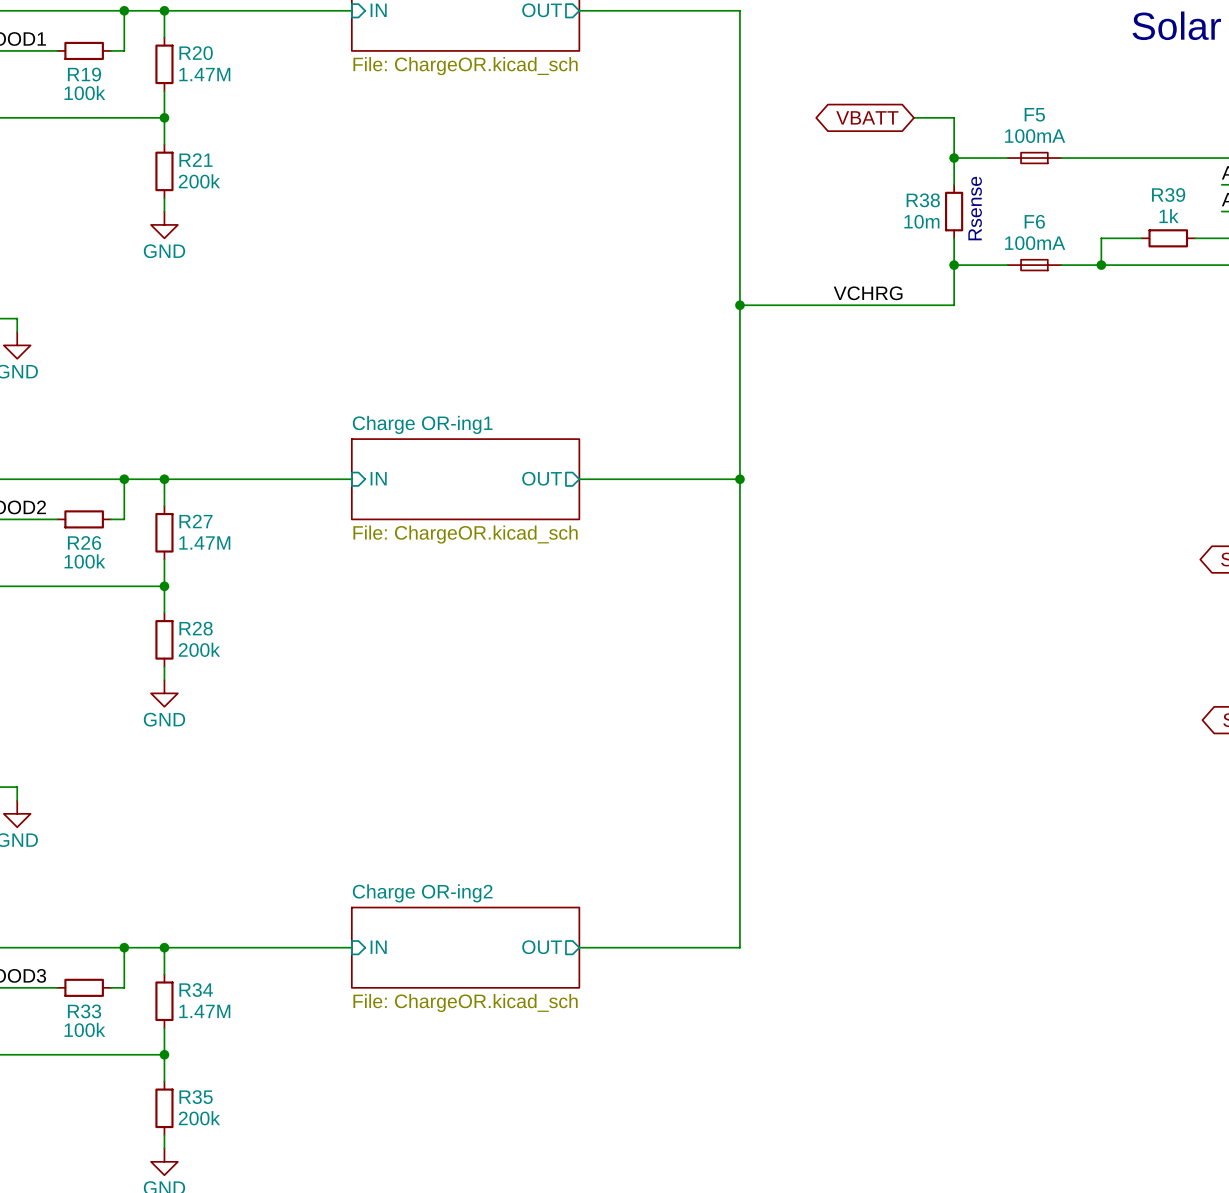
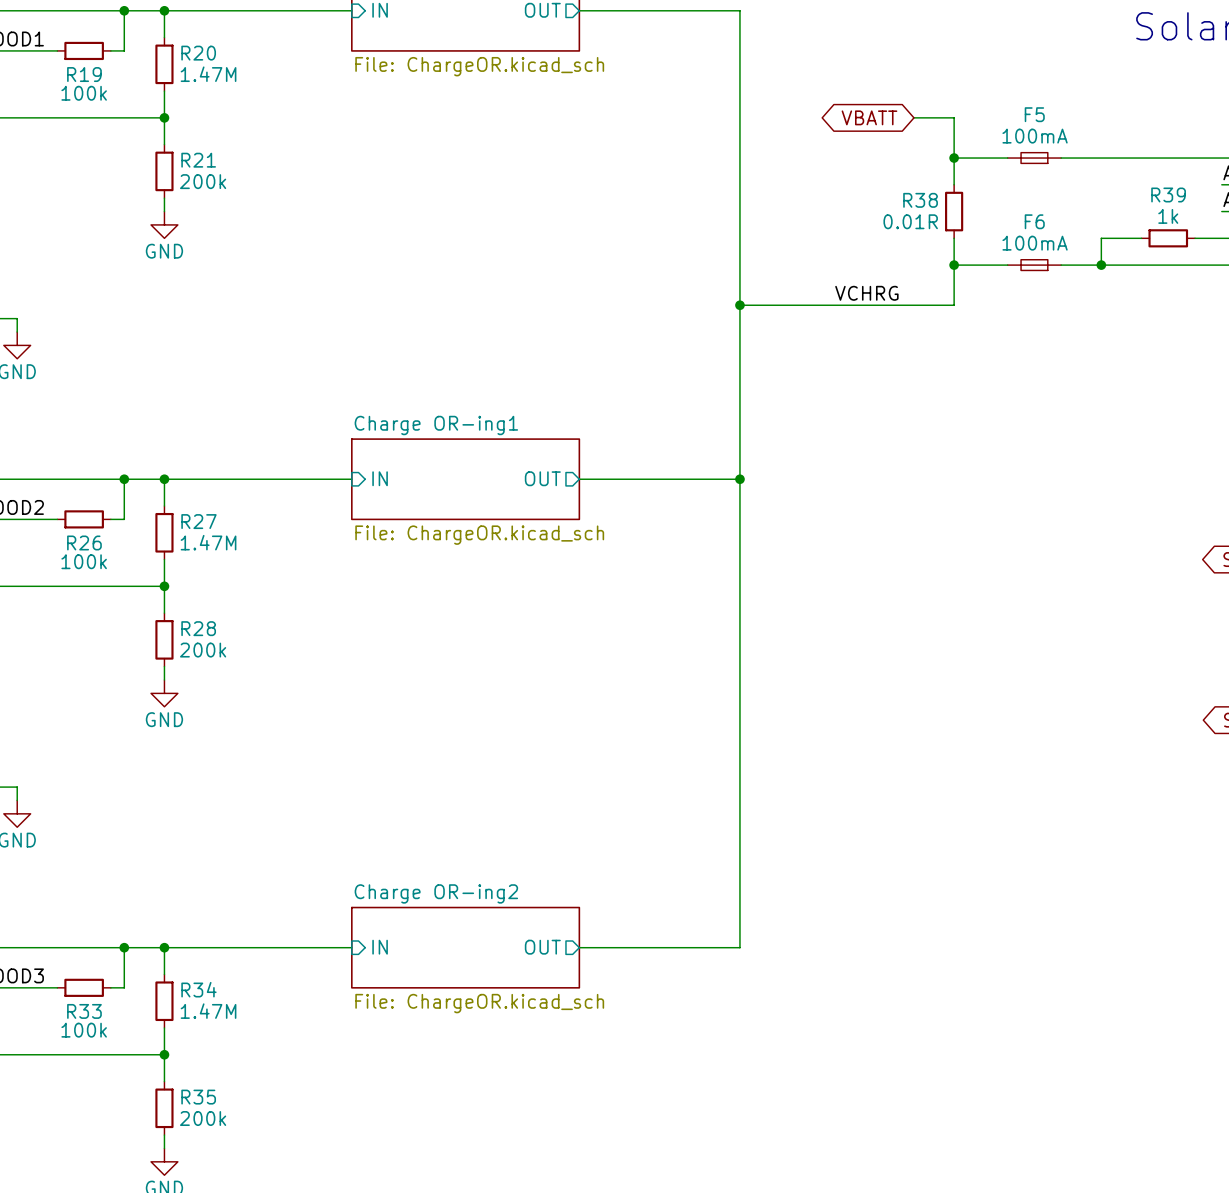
text: Rsense (975, 208) -> none
R38 value: 10m (921, 221) -> 0.01R (910, 221)

